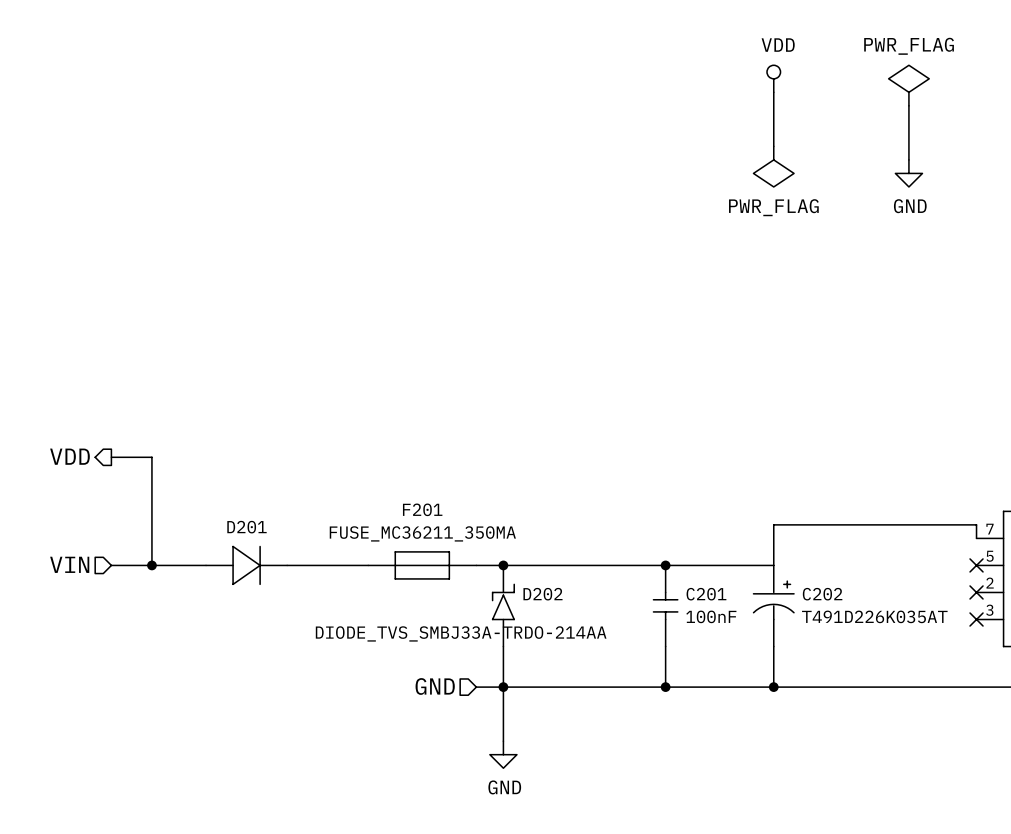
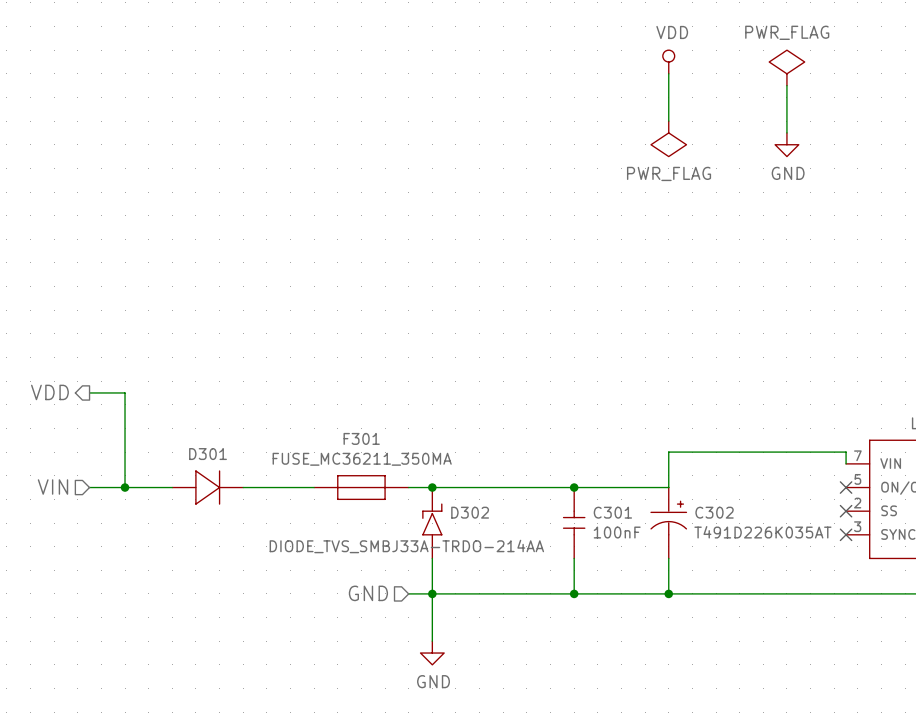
F201 name: F201 (422, 509) -> F301 (361, 438)
D201 name: D201 (246, 527) -> D301 (208, 454)
D202 name: D202 (542, 594) -> D302 (470, 512)
C201 name: C201 (706, 594) -> C301 (612, 512)
C202 name: C202 (822, 594) -> C302 (714, 512)

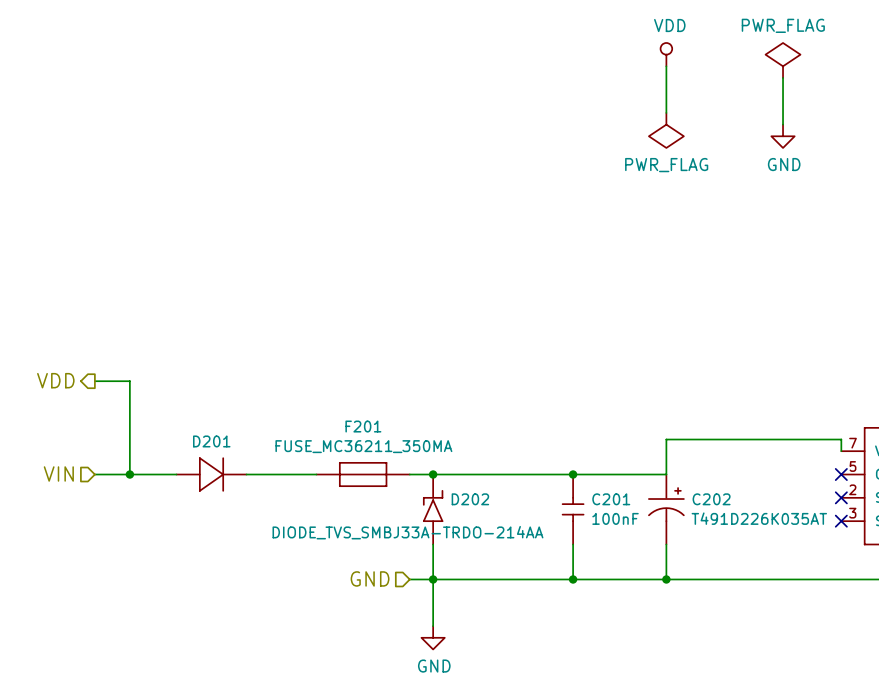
F301 name: F301 (361, 438) -> F201 (363, 426)
D301 name: D301 (208, 454) -> D201 (211, 441)
D302 name: D302 (470, 512) -> D202 (470, 499)
C301 name: C301 (612, 512) -> C201 (611, 499)
C302 name: C302 (714, 512) -> C202 (711, 499)

